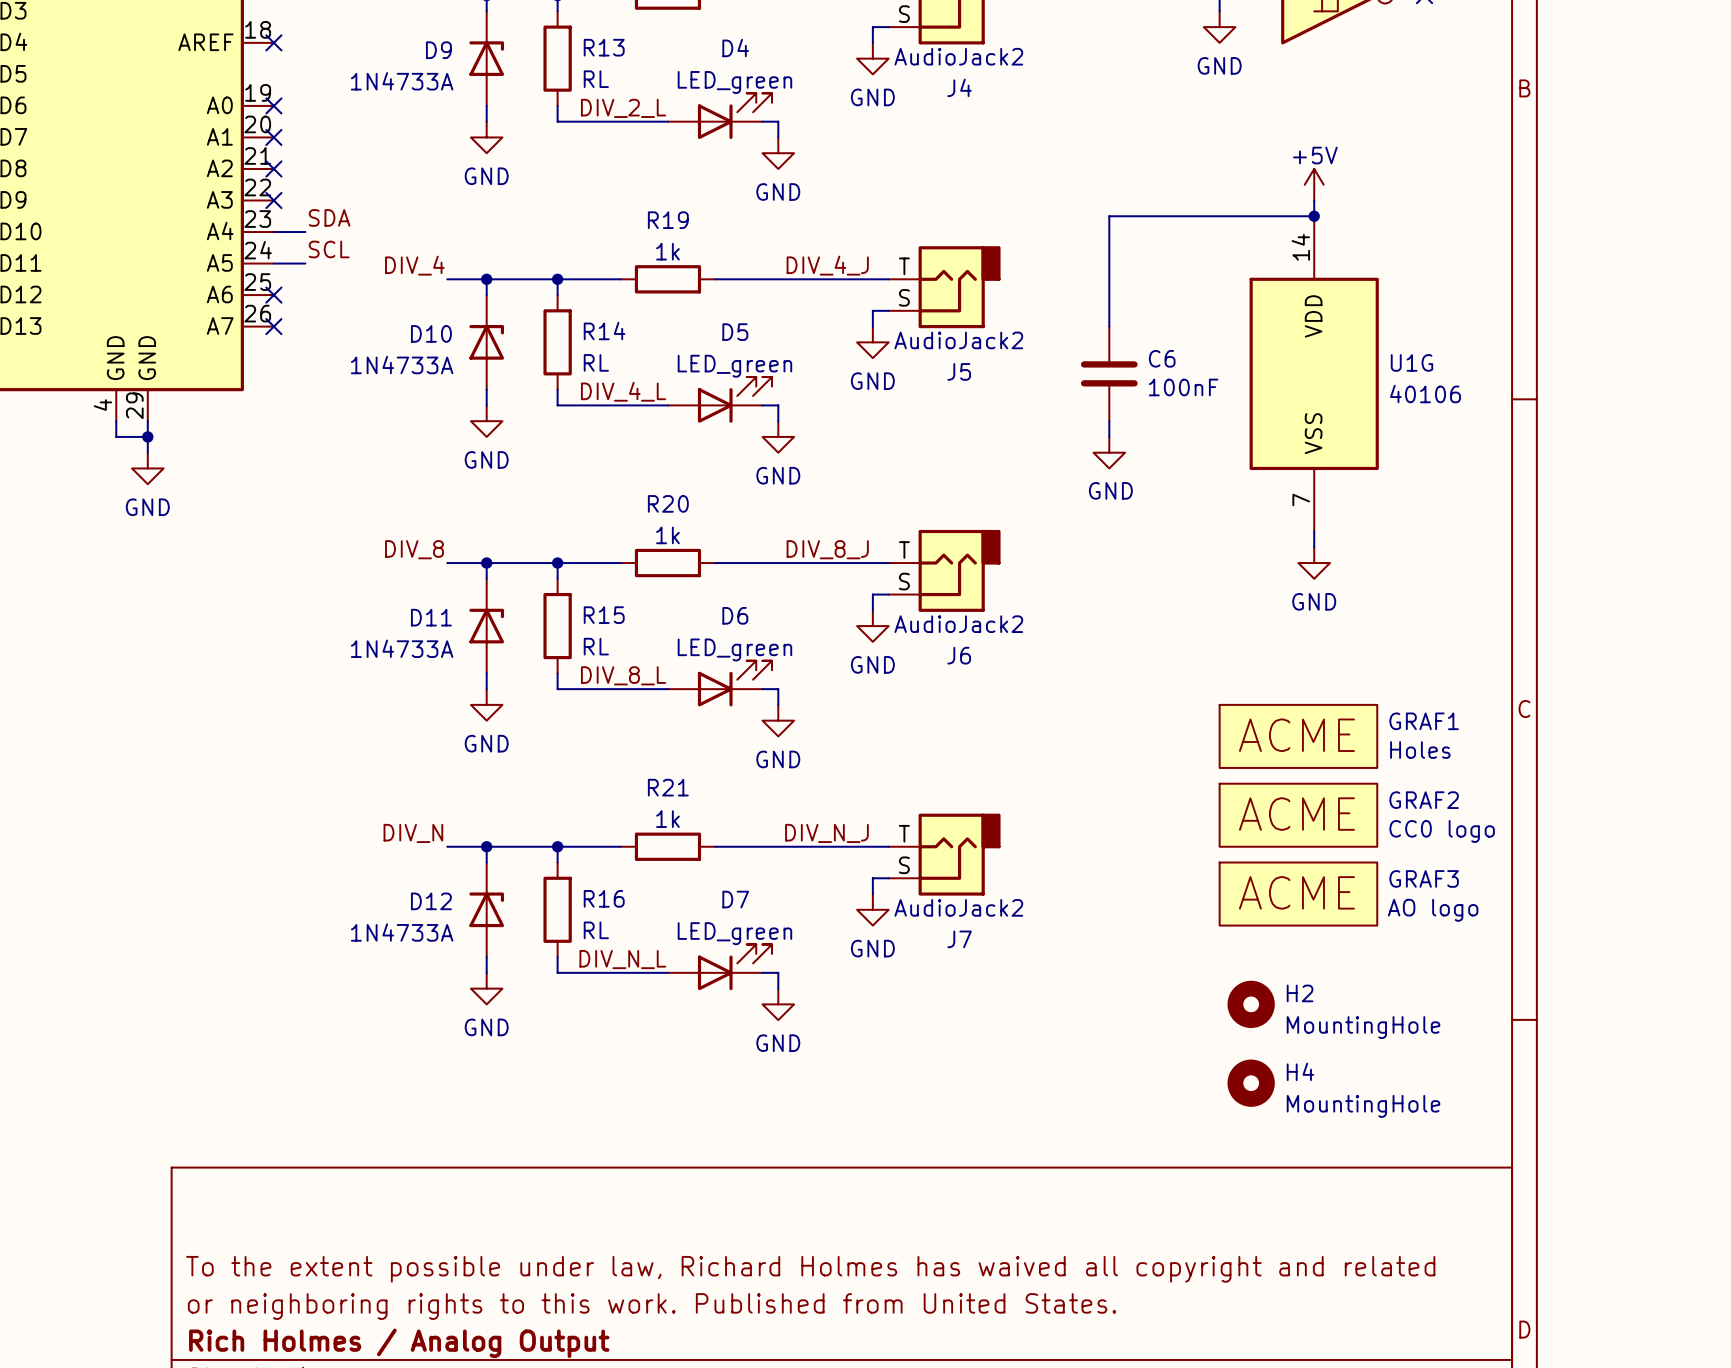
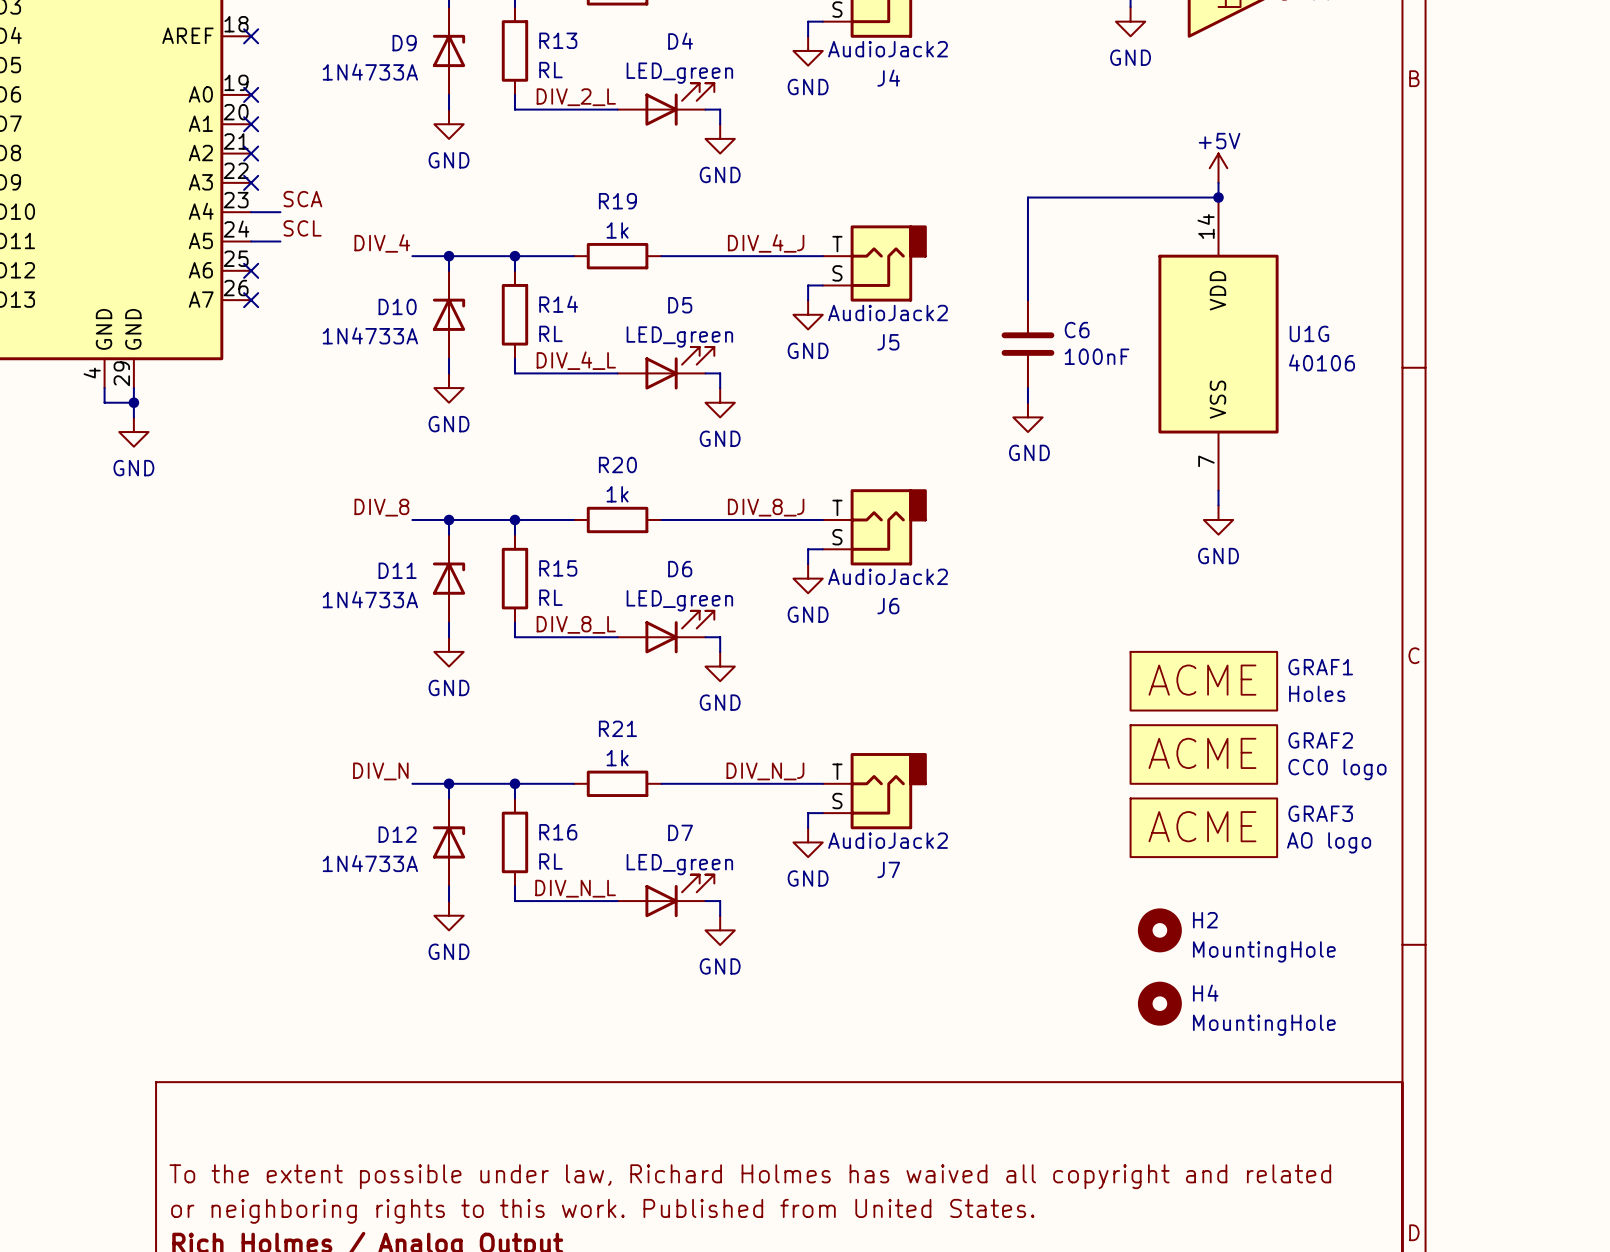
label: SDA (329, 217) -> SCA (302, 199)

